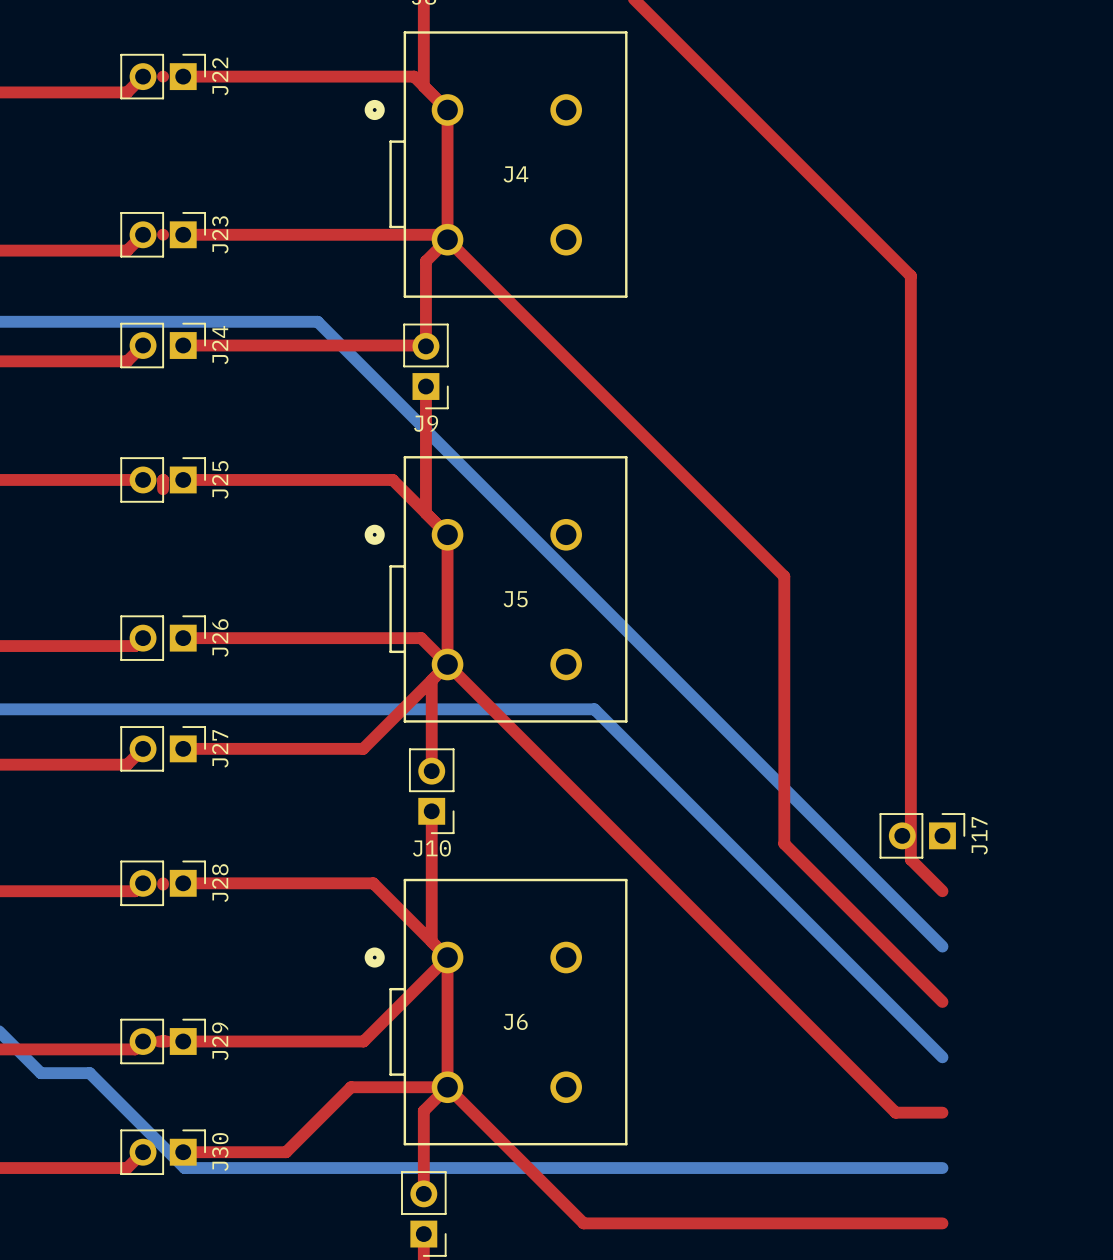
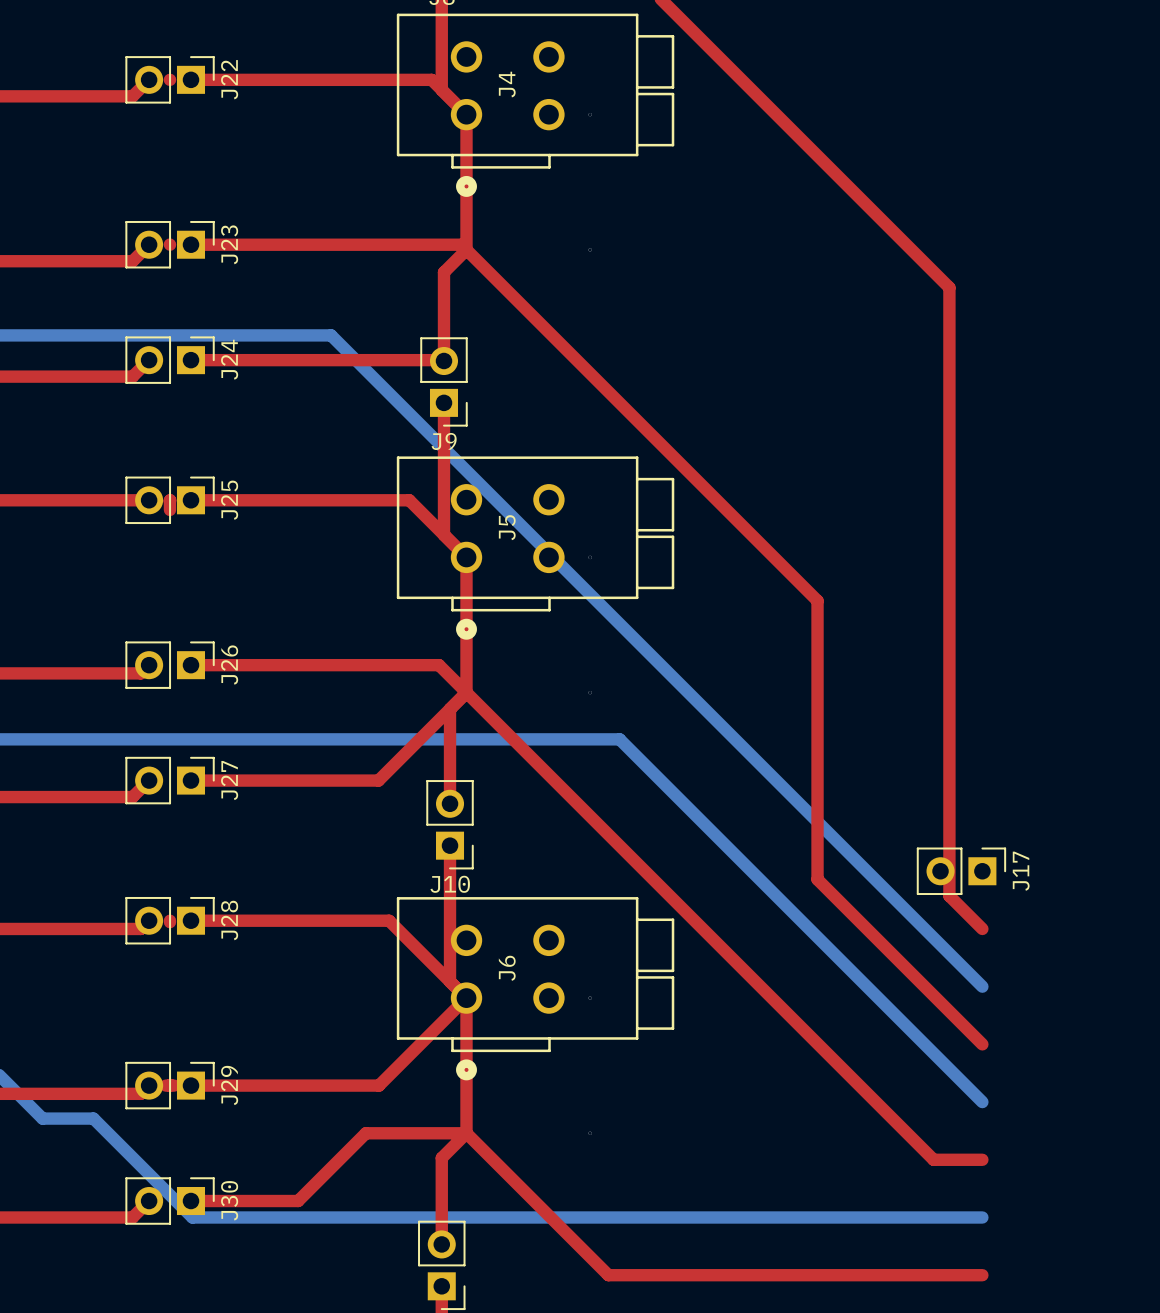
J4 footprint: [364, 31, 628, 298] -> [396, 13, 675, 197]
J4 name position: J4 (515, 174) -> J4 (507, 84)
J5 footprint: [364, 456, 628, 723] -> [396, 456, 675, 640]
J5 name position: J5 (515, 599) -> J5 (507, 527)
J6 footprint: [364, 878, 628, 1146] -> [396, 897, 675, 1081]
J6 name position: J6 (515, 1021) -> J6 (507, 968)

